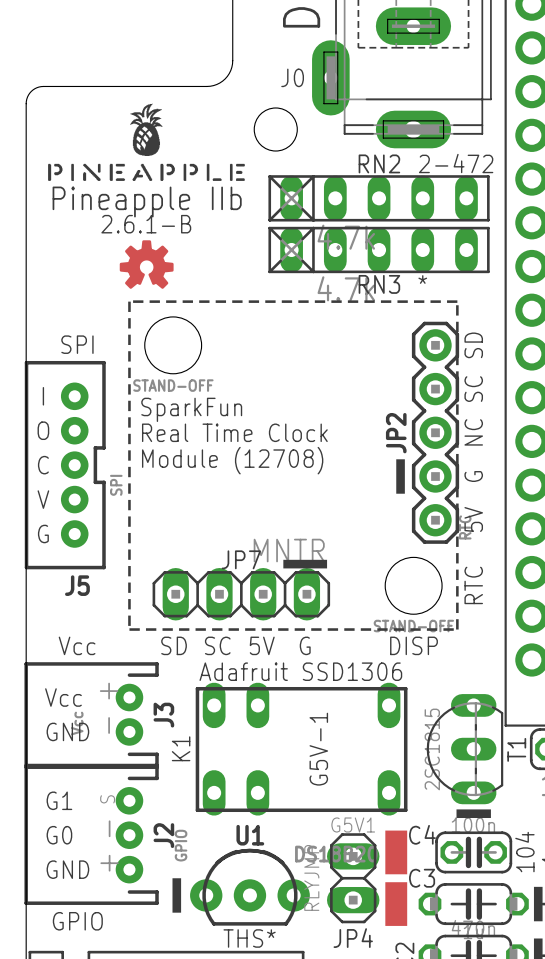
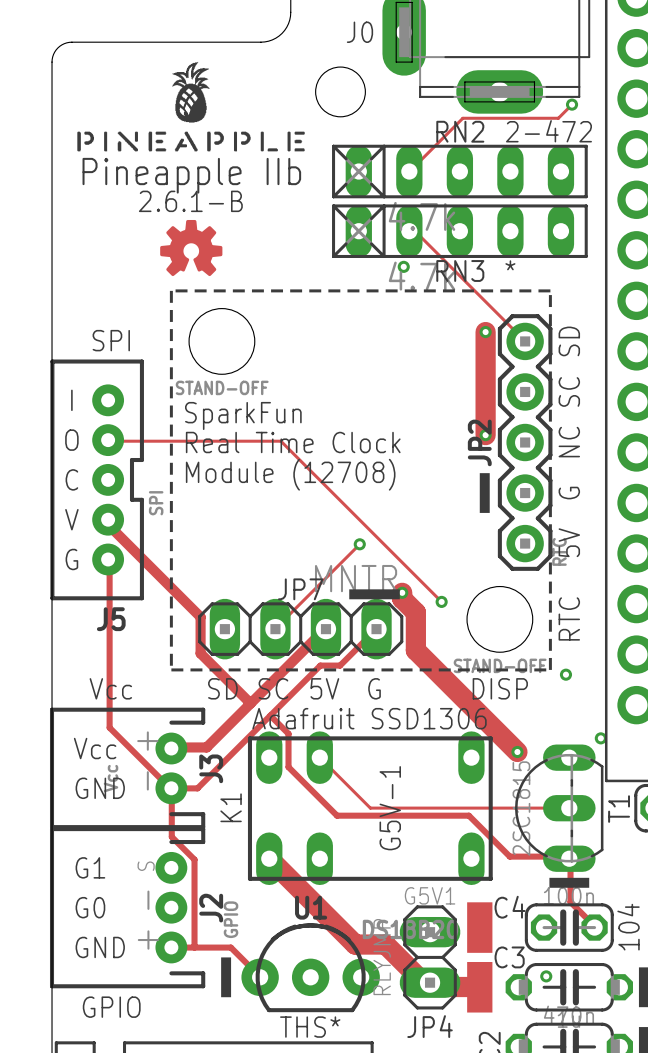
track: none -> (572, 104) (558, 118) (462, 118) (409, 171)
via: none -> (572, 104)
track: none -> (409, 231) (415, 231) (525, 341)
via: none -> (403, 266)
track: none -> (485, 332) (485, 435)
via: none -> (485, 332)
via: none -> (485, 435)
track: none -> (108, 440) (280, 441) (441, 601)
track: none -> (108, 519) (109, 526) (200, 617) (200, 653) (250, 703)
track: none -> (359, 544) (275, 629)
via: none -> (359, 544)
track: none -> (108, 559) (109, 727) (171, 788)
track: none -> (402, 592) (402, 598) (415, 612) (415, 650) (517, 752)
via: none -> (402, 592)
via: none -> (441, 601)
track: none -> (325, 629) (206, 747) (171, 748)
track: none -> (376, 629) (340, 665) (320, 665) (197, 788) (171, 788)
via: none -> (565, 674)
track: none -> (270, 715) (288, 733) (288, 767) (337, 815) (468, 815) (509, 856) (567, 856) (570, 859) (570, 902) (594, 927)
via: none -> (600, 738)
via: none -> (517, 752)
track: none -> (319, 757) (370, 808) (569, 808)
track: none -> (171, 788) (171, 836) (194, 859) (194, 947)
track: none -> (269, 858) (355, 944) (385, 944) (420, 979) (430, 982) (434, 987) (479, 987)
track: none -> (171, 947) (230, 947) (260, 977)
via: none -> (546, 976)

